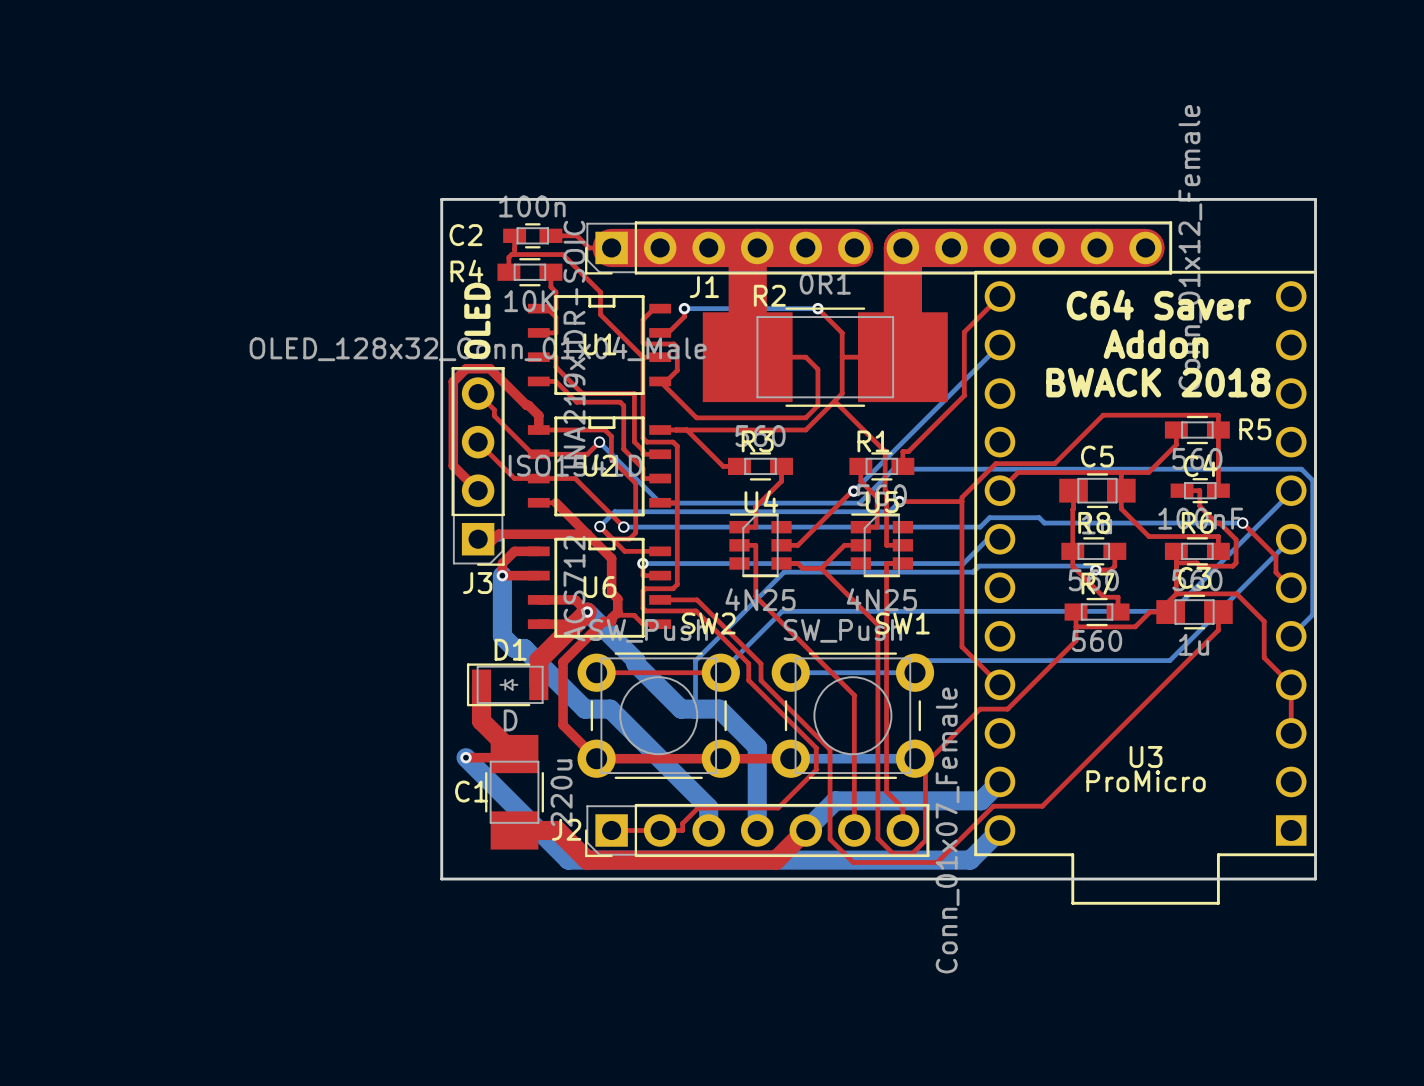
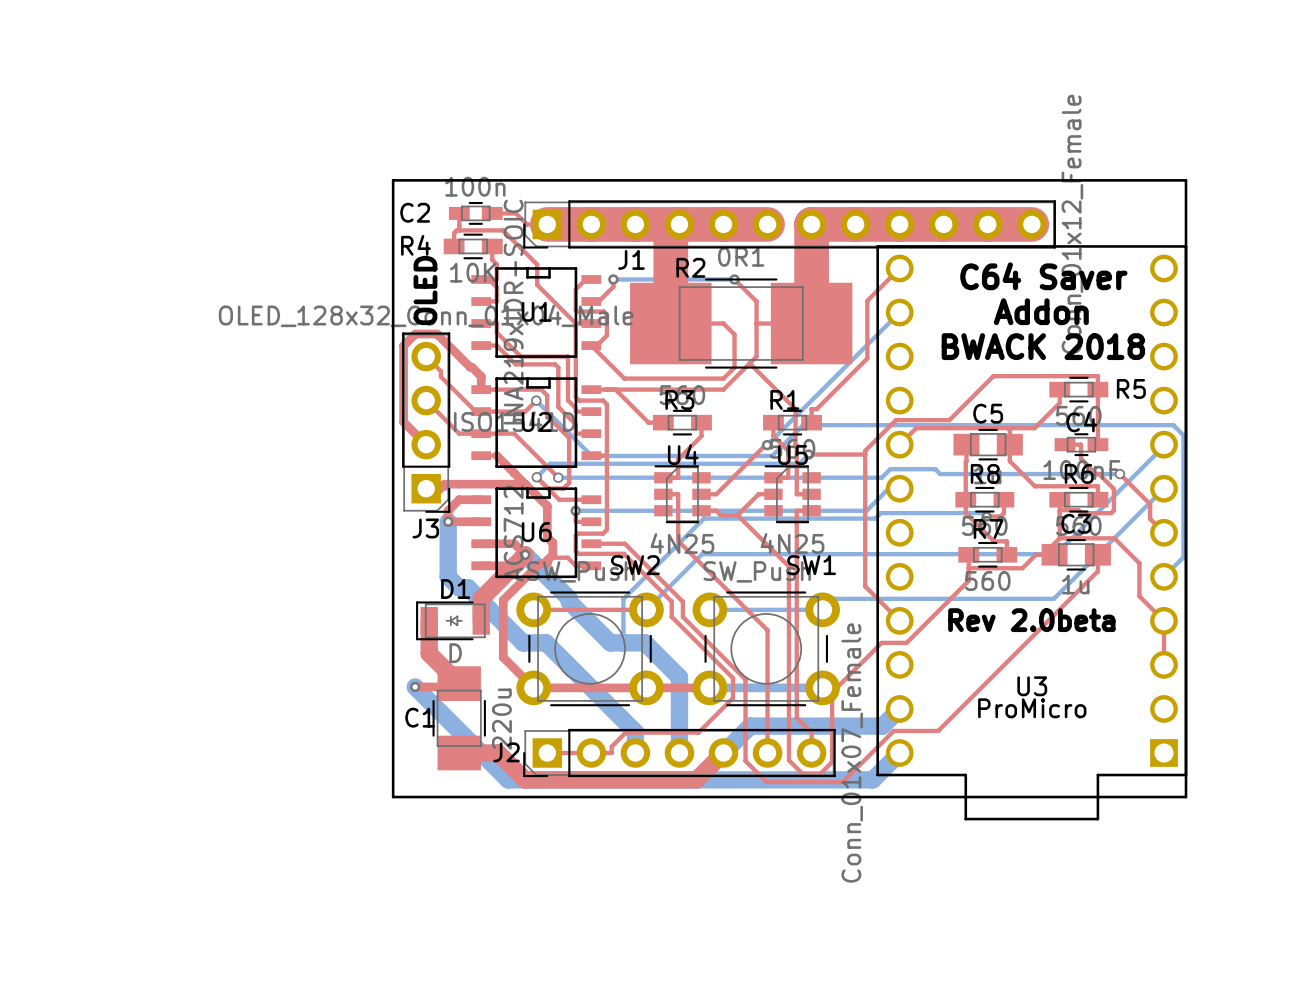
text: none -> Rev 2.0beta (1031, 620)

